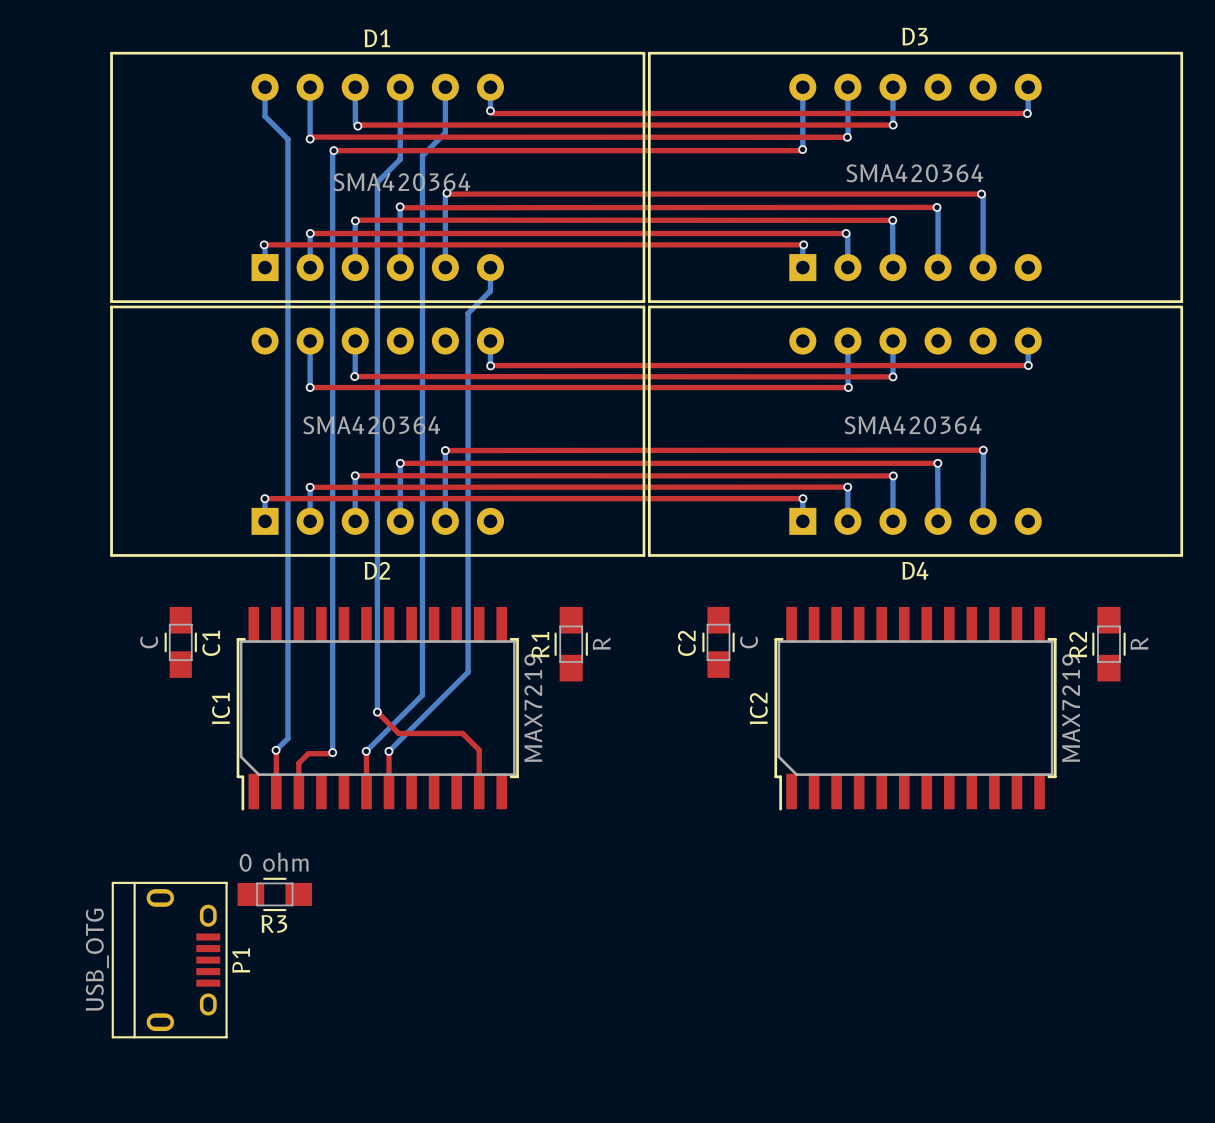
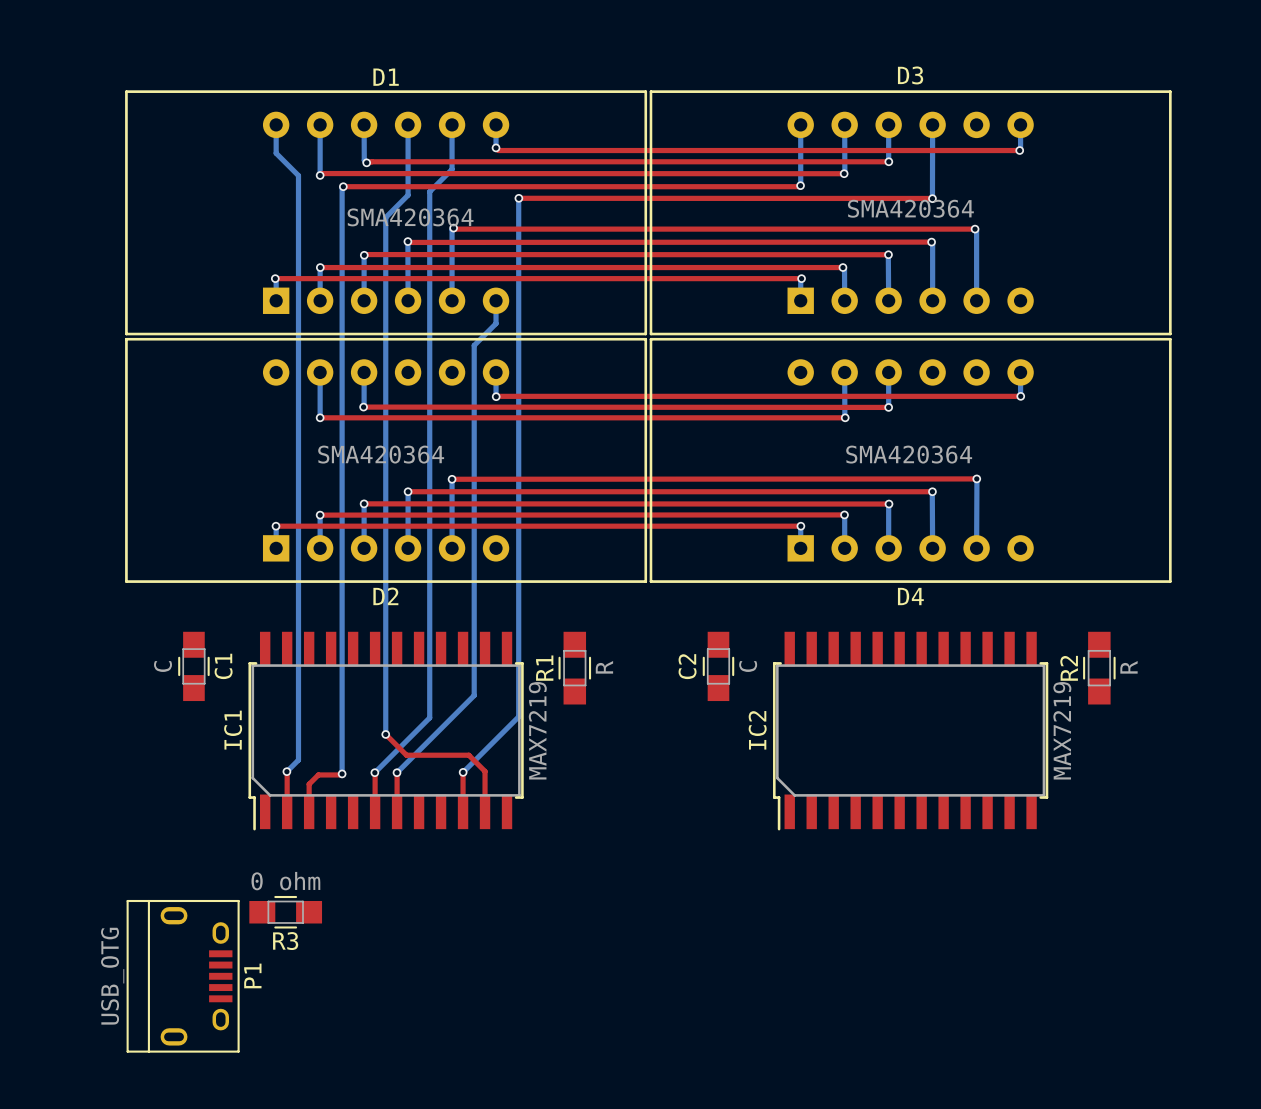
bottom track: none -> (932, 124) (932, 198)
bottom track: none -> (518, 198) (518, 716) (463, 772)
top track: none -> (518, 198) (932, 198)
via: none -> (518, 198)
via: none -> (932, 198)
top track: none -> (463, 772) (463, 811)
via: none -> (463, 772)

